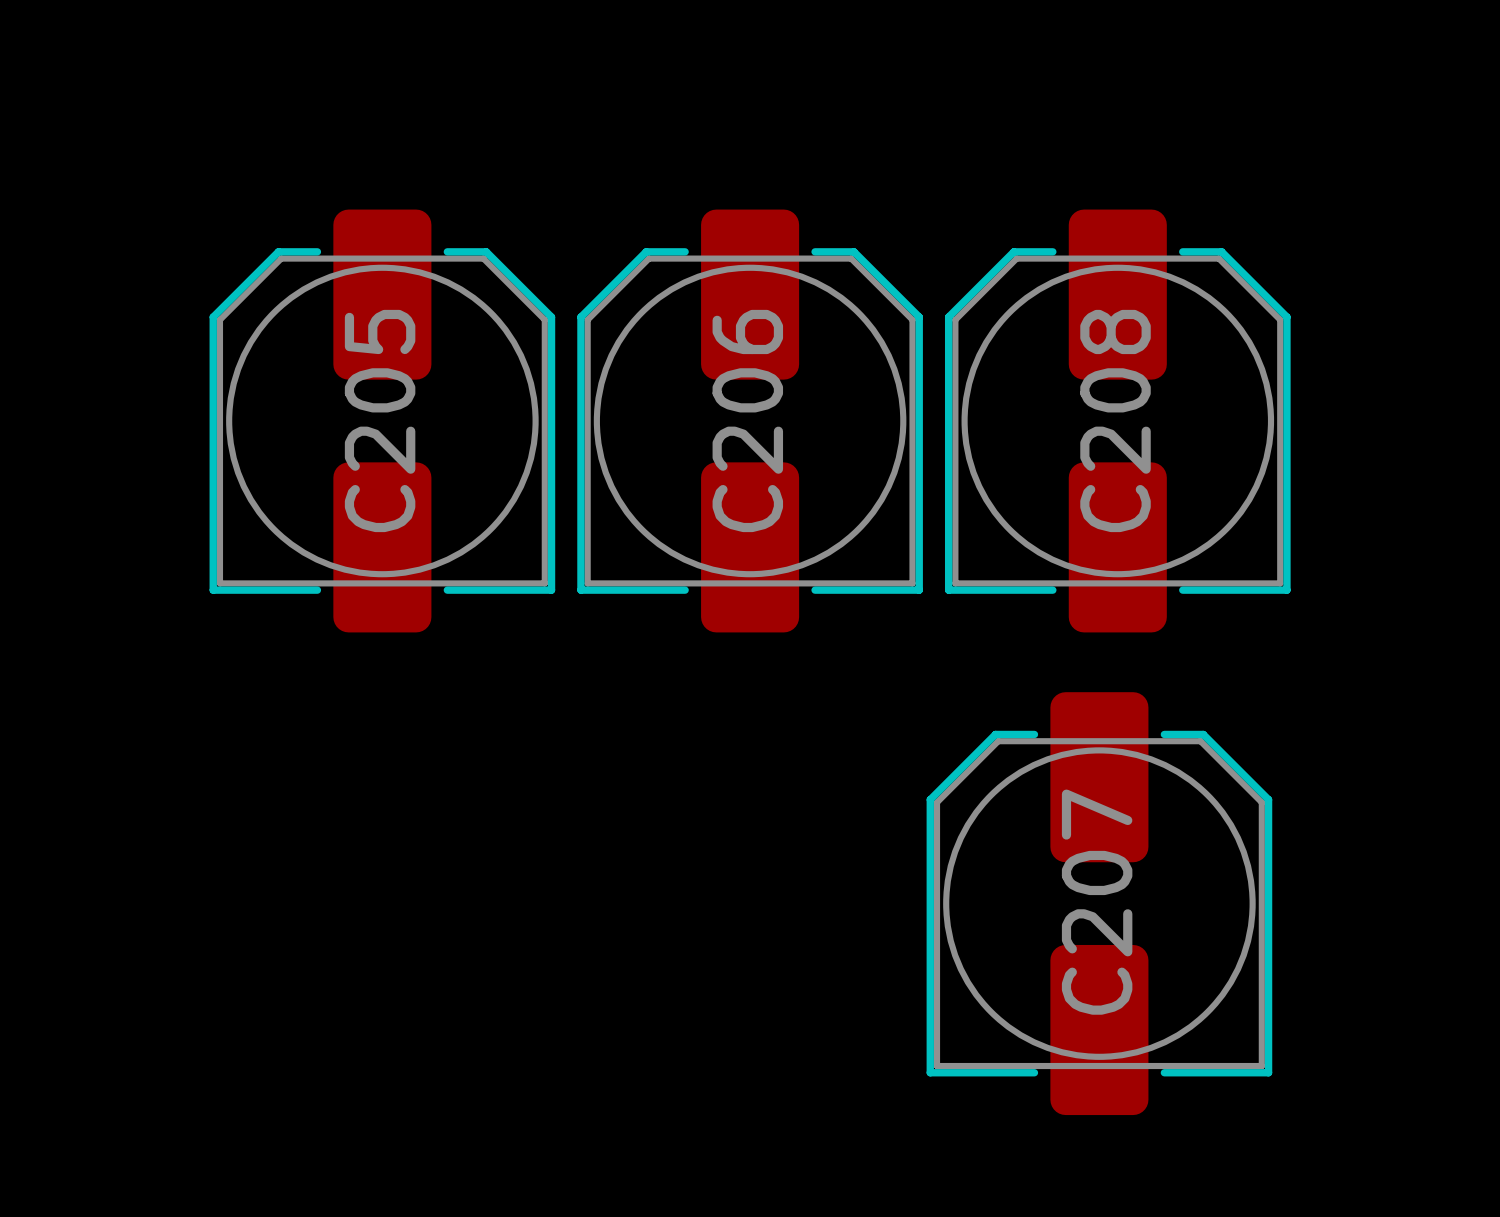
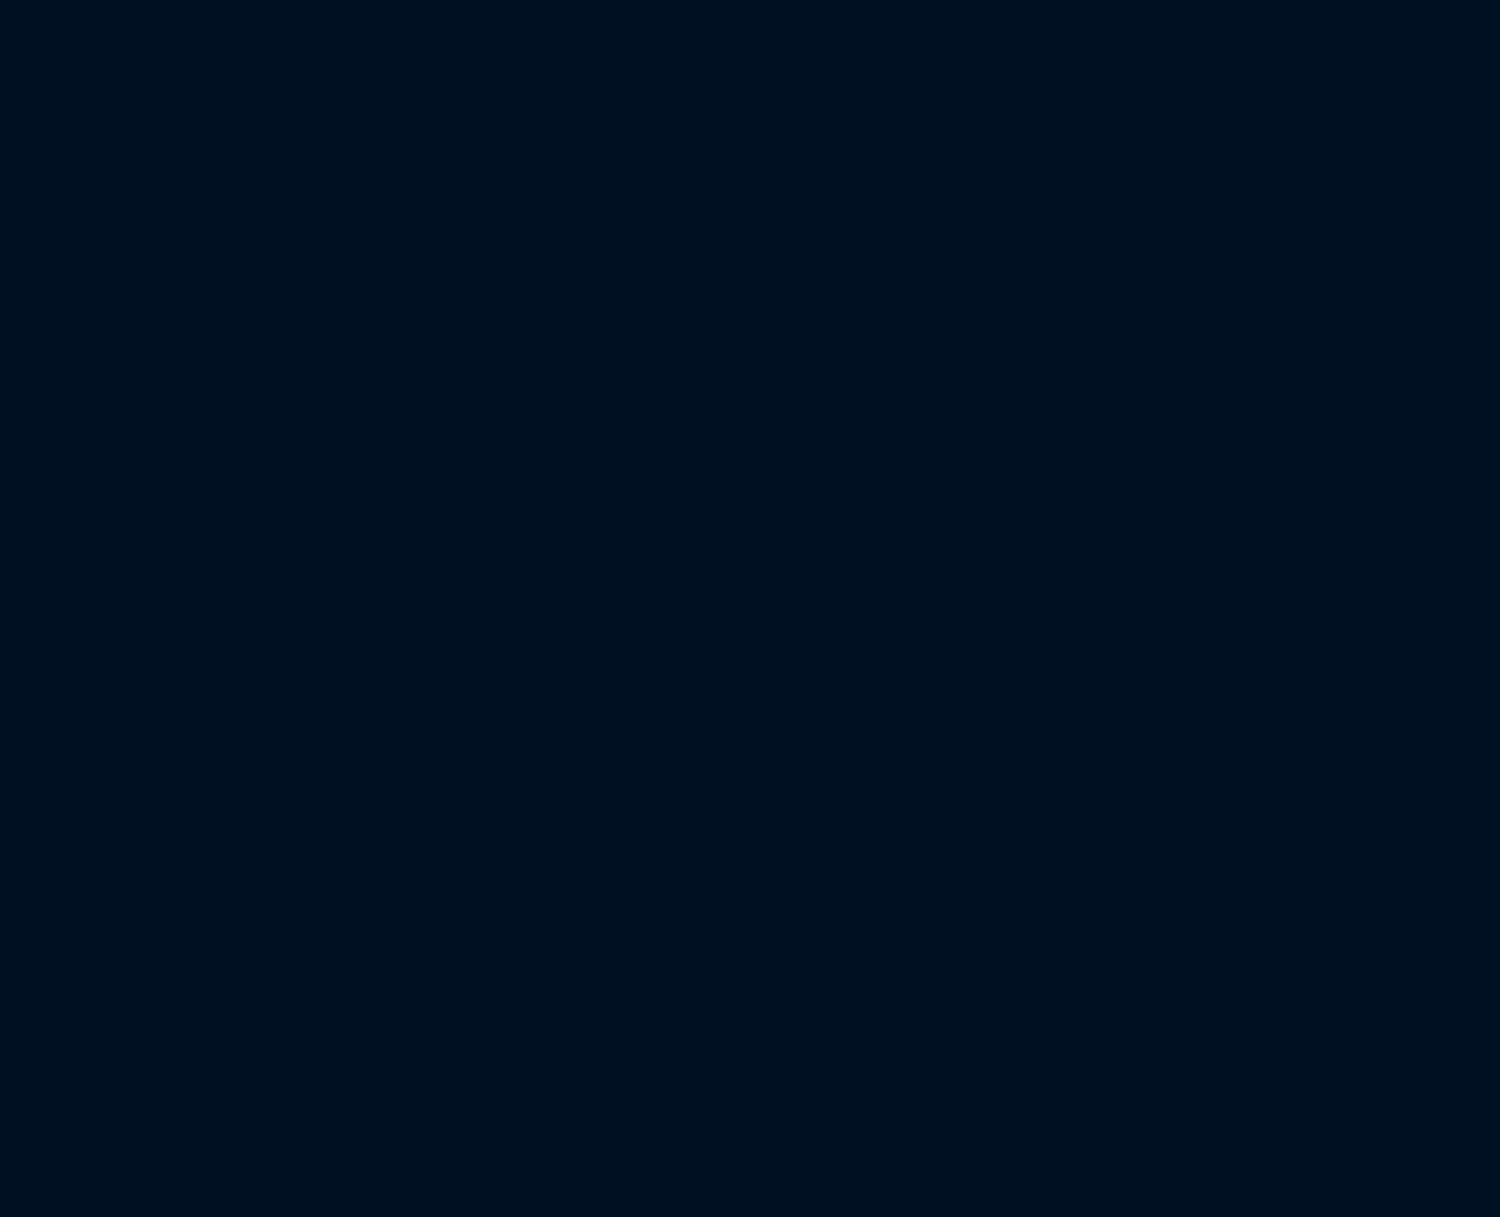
C205: (382, 420) -> none
C206: (750, 420) -> none
C208: (1117, 420) -> none
C207: (1099, 903) -> none

